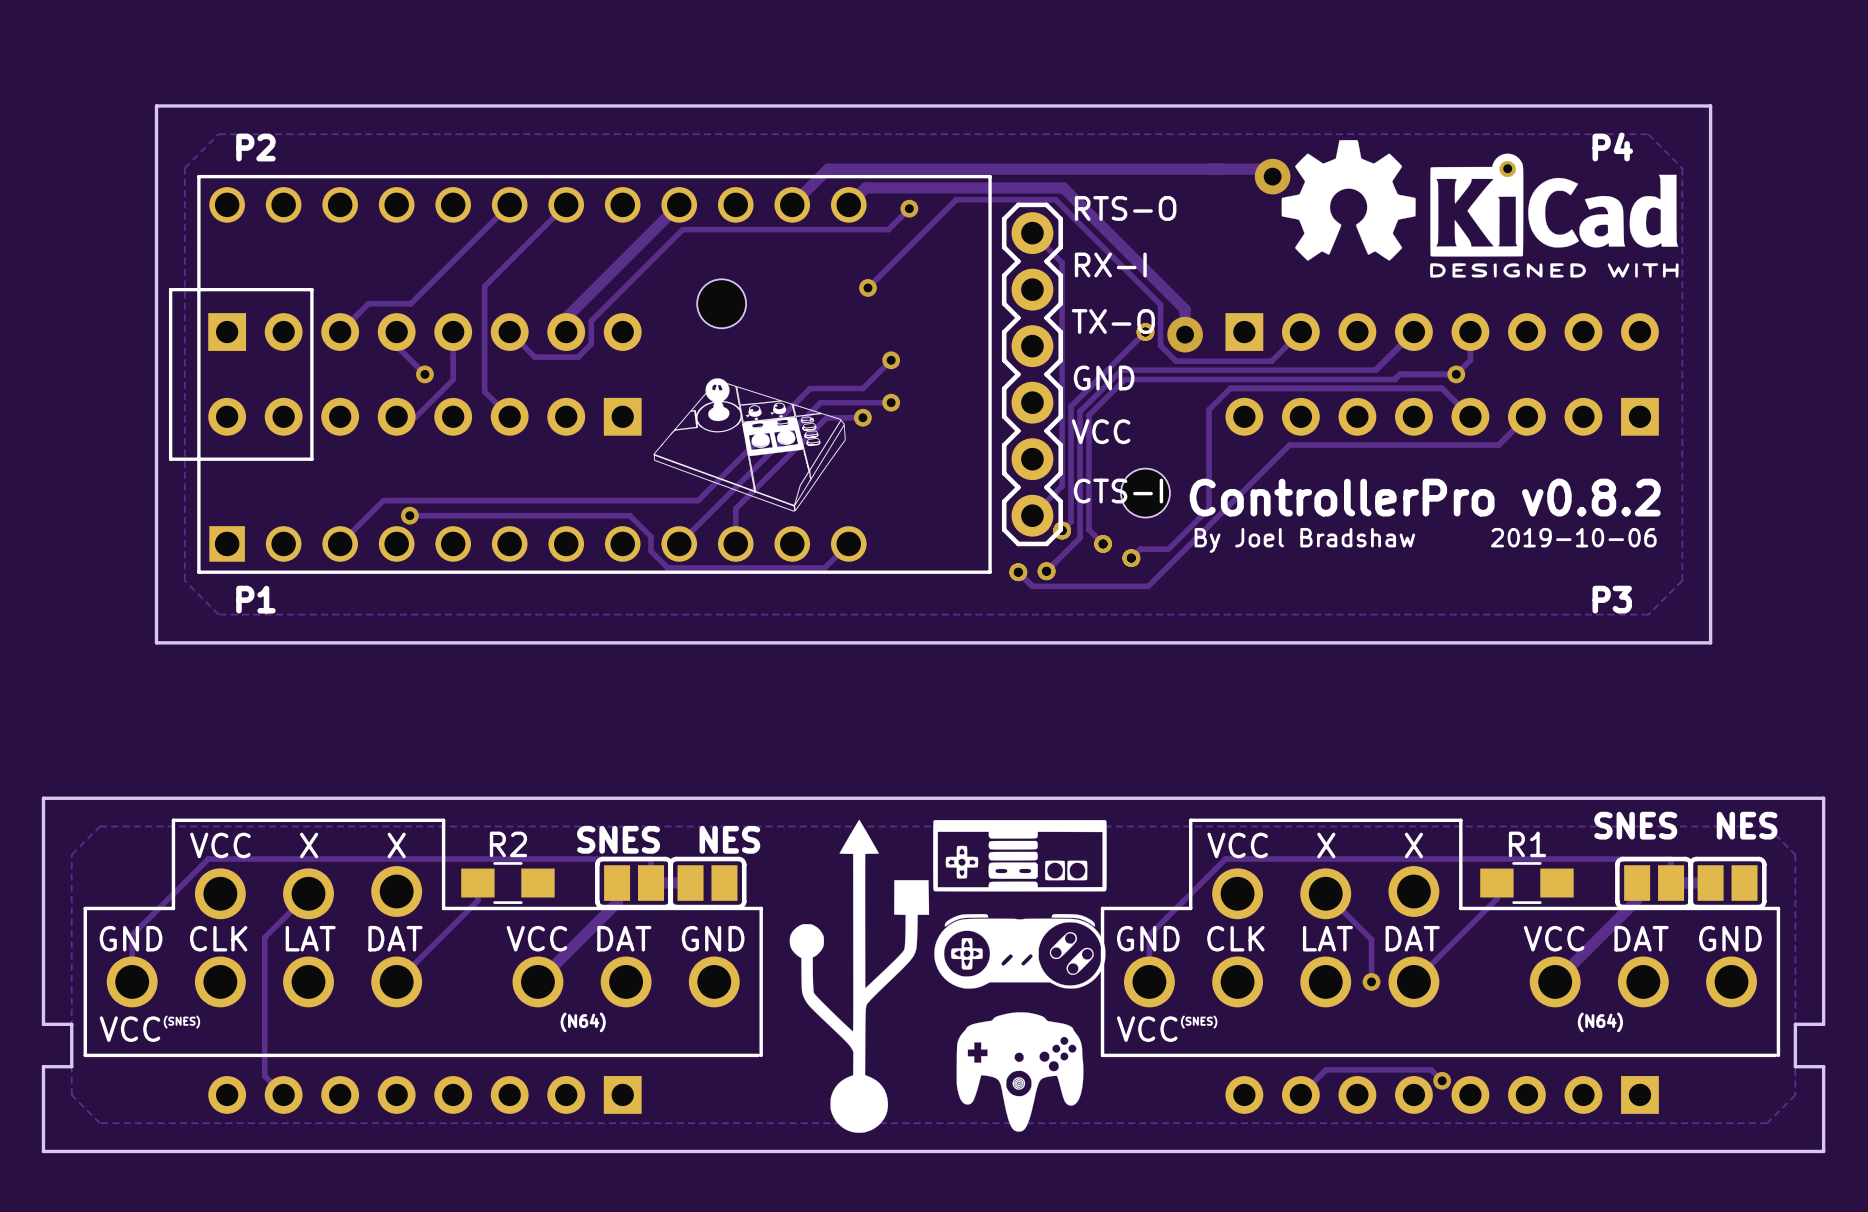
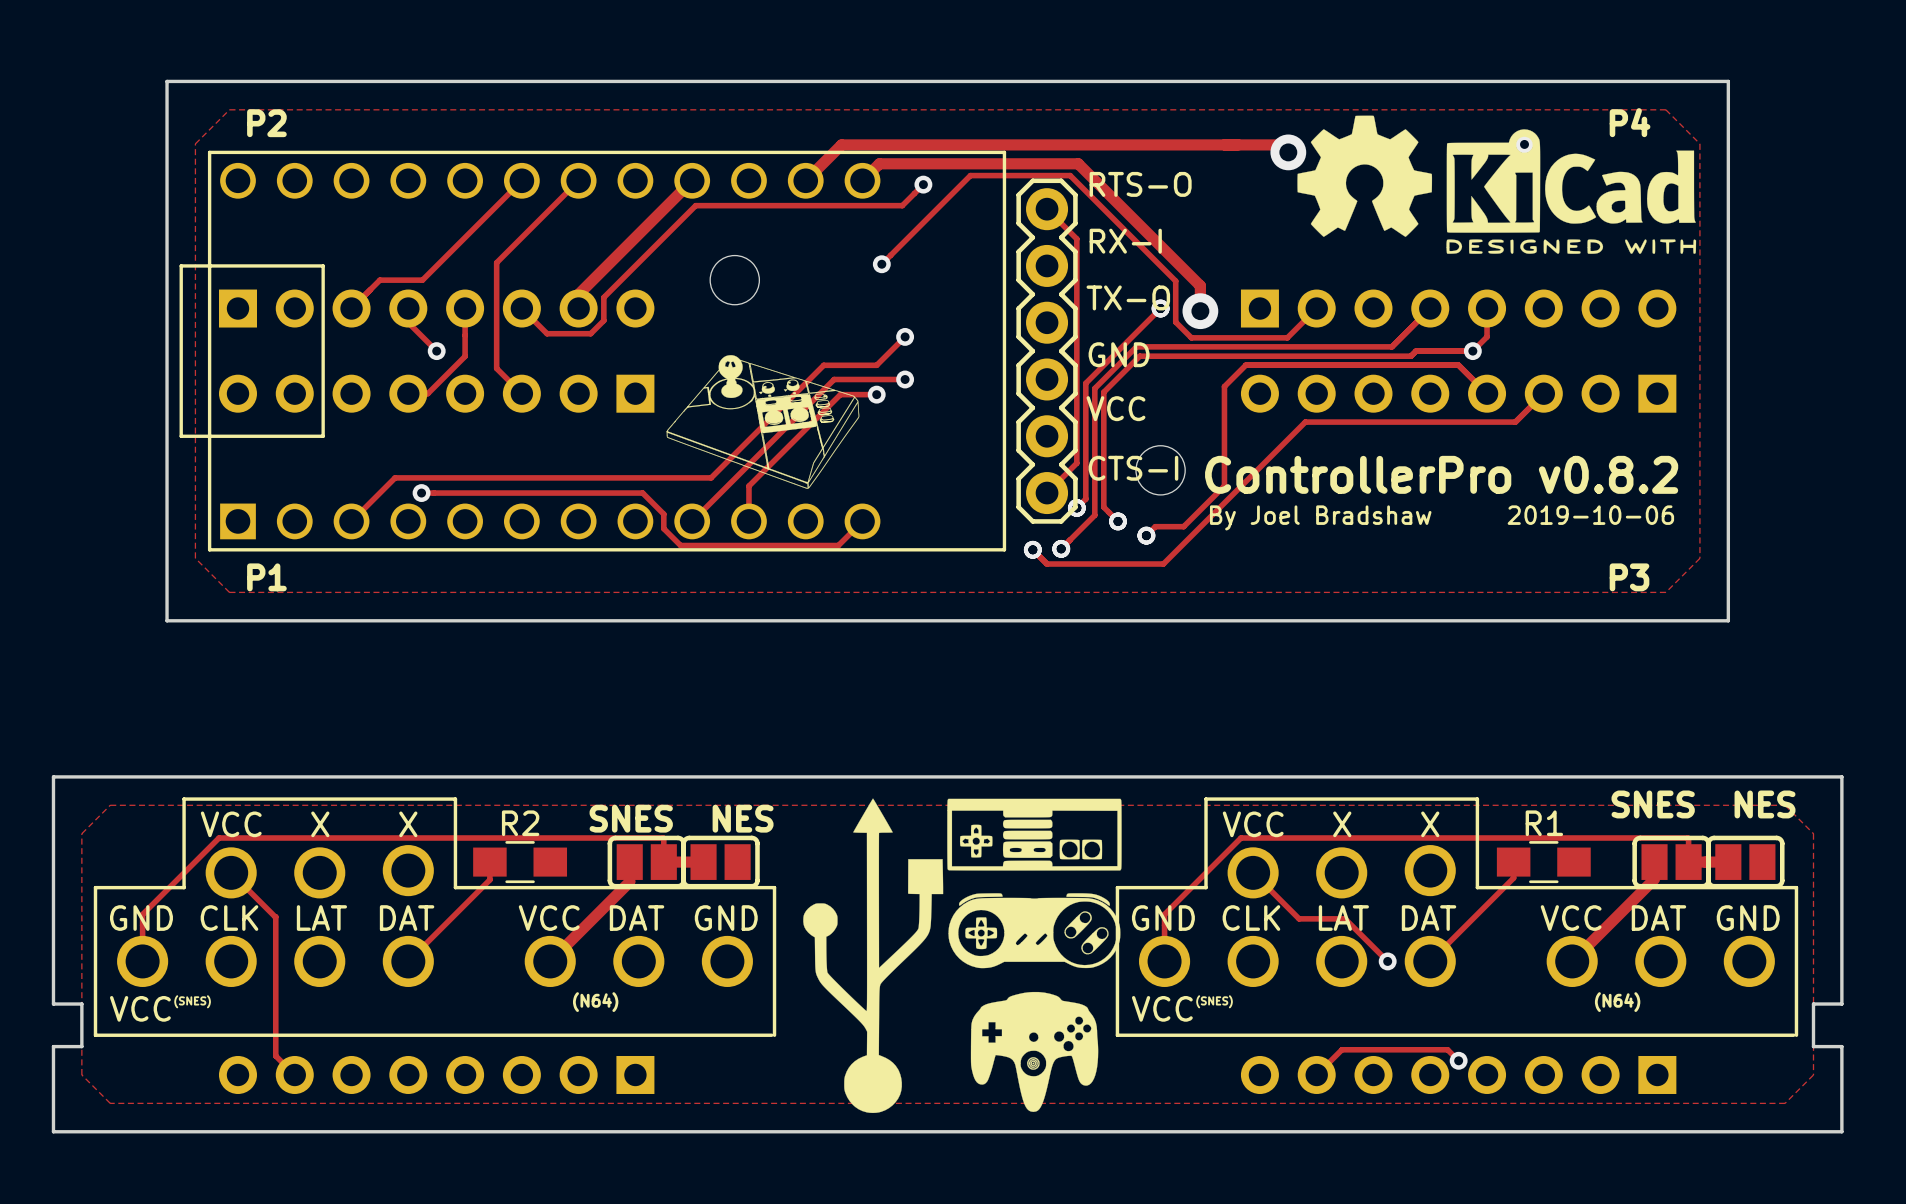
track: (308, 893) (264, 937) -> (231, 872) (275, 916)
track: (1325, 893) (1371, 939) (1371, 981) -> (1253, 872) (1299, 918) (1345, 918) (1387, 961)

